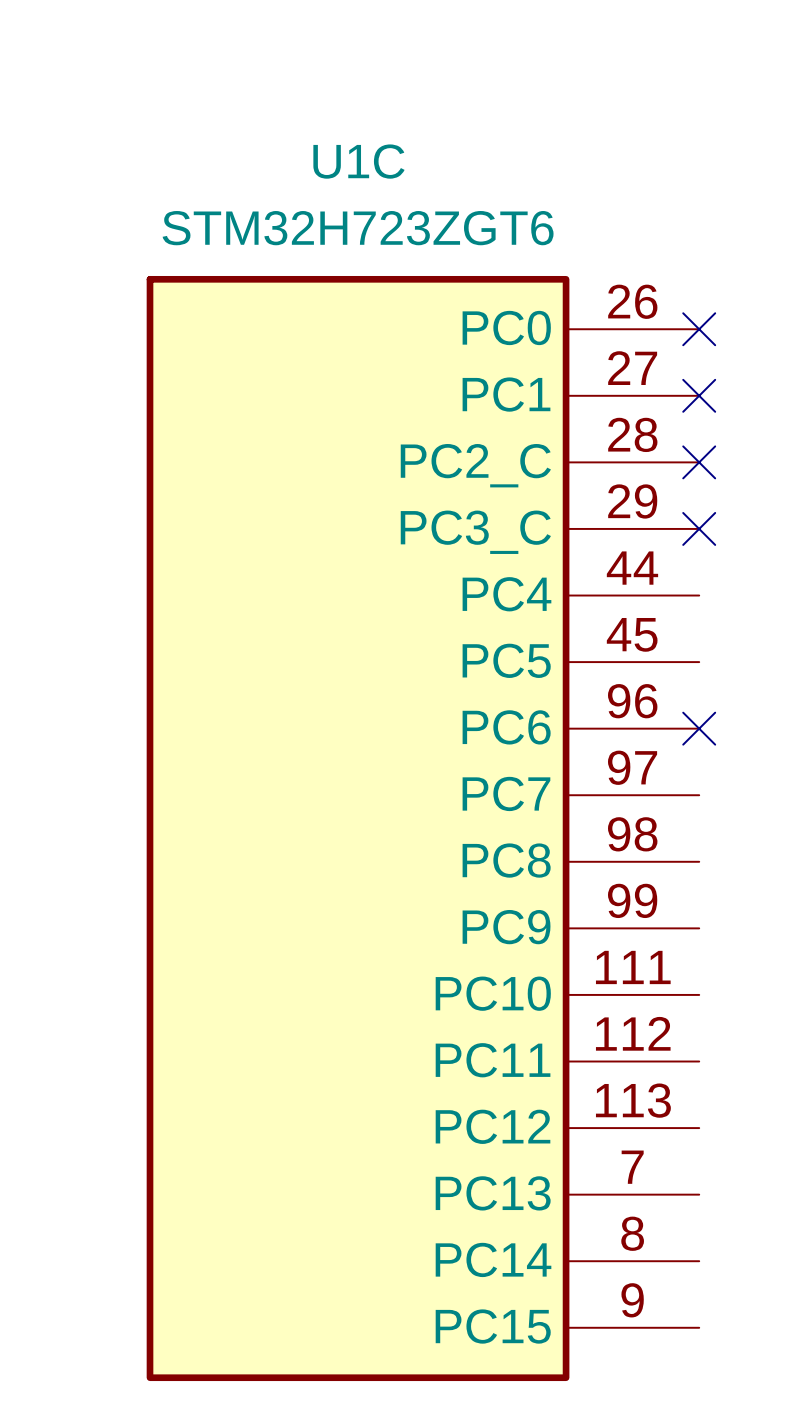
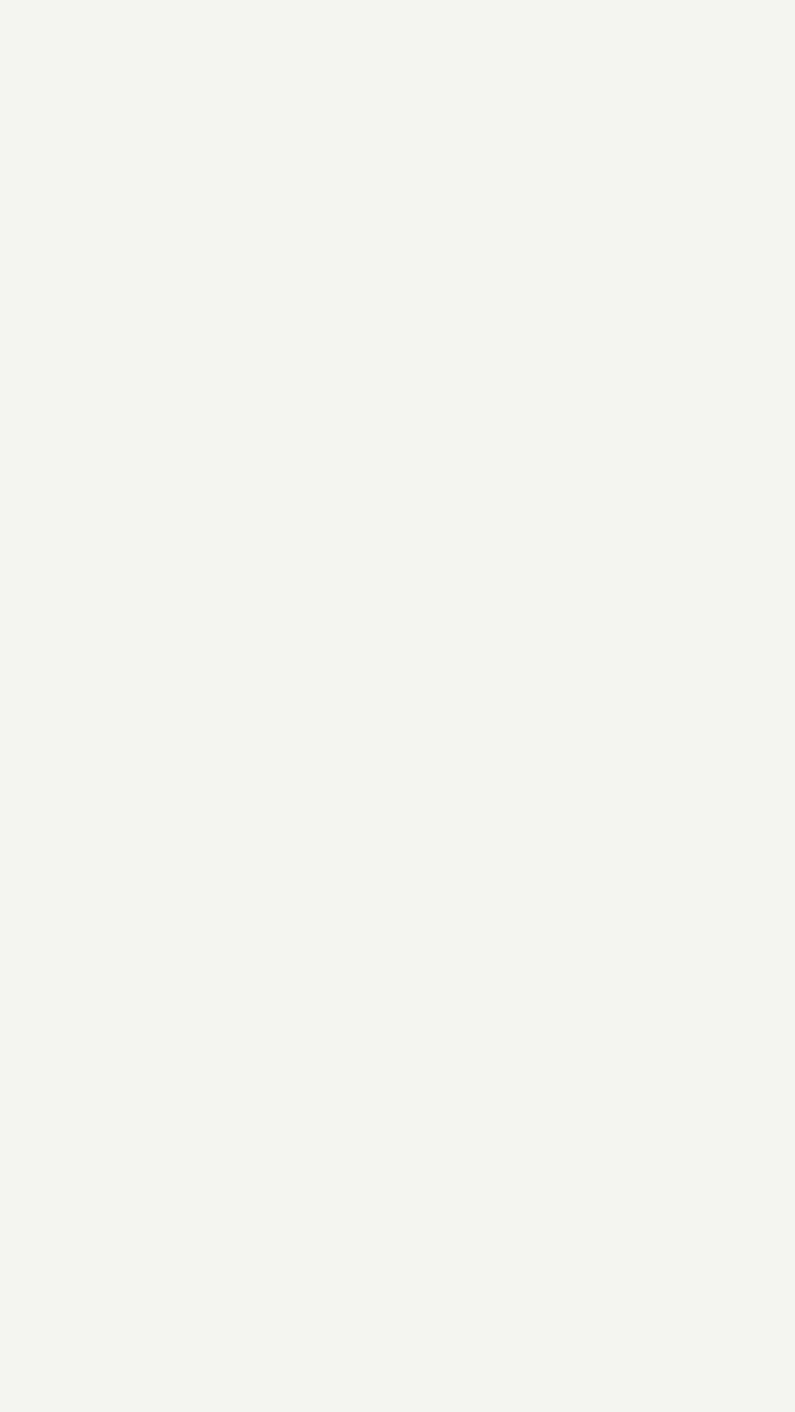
no-connect mark: (699, 329) -> none
no-connect mark: (699, 395) -> none
no-connect mark: (699, 462) -> none
no-connect mark: (699, 528) -> none
no-connect mark: (699, 728) -> none
U1C: STM32H723ZGT6 (422, 828) -> none

